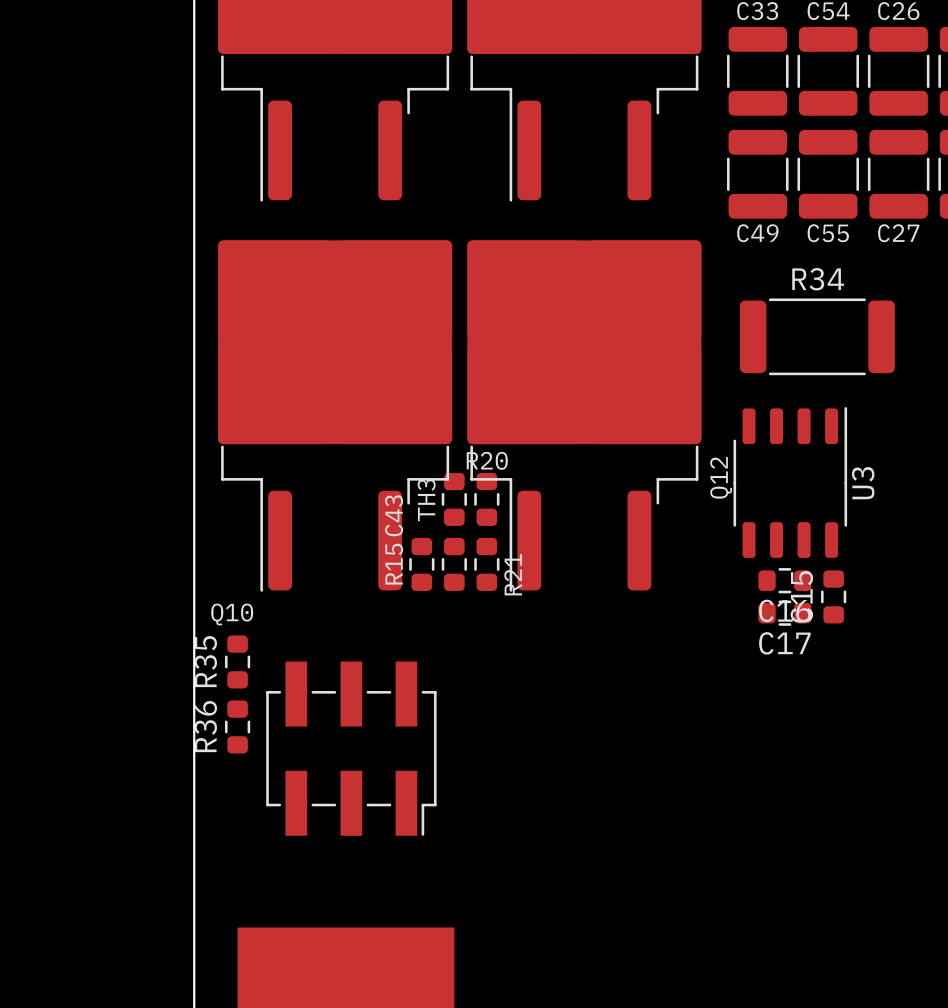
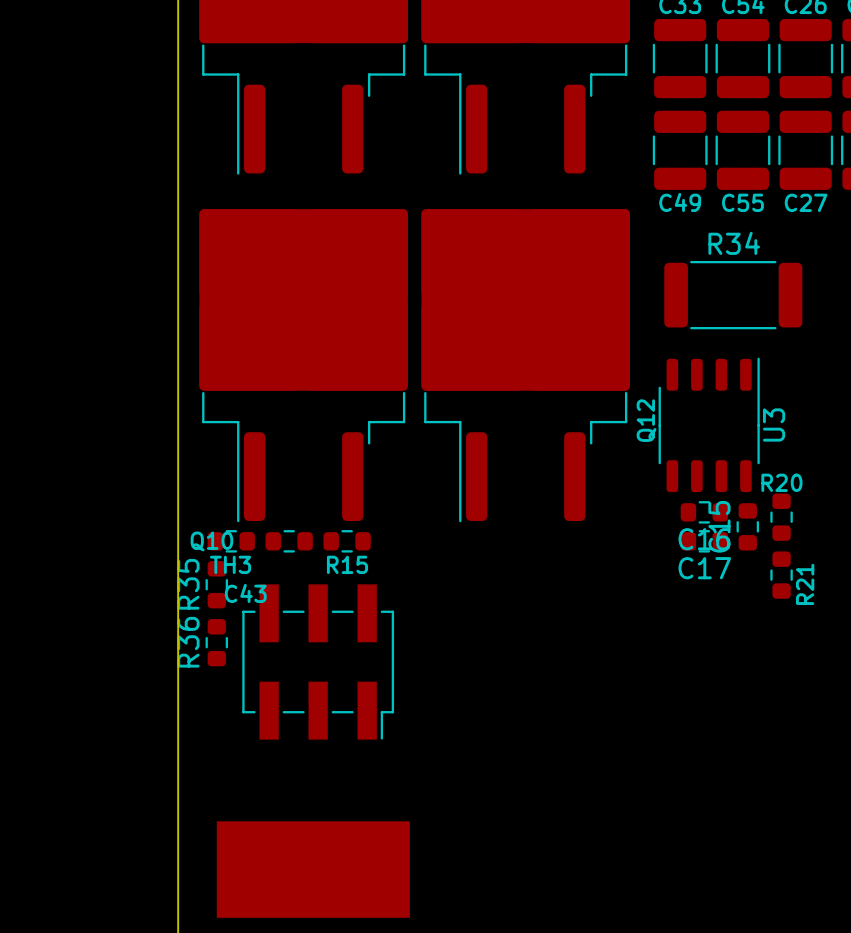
TH3 rotation: 0° (454, 499) -> 90° clockwise (231, 541)
TH3 position: (454, 499) -> (231, 541)
R20 position: (486, 499) -> (781, 517)
C43 name position: C43 (394, 515) -> C43 (245, 593)
R15 rotation: 0° (421, 564) -> 90° clockwise (347, 541)
R15 position: (421, 564) -> (347, 541)
C43 rotation: 0° (454, 564) -> 90° clockwise (289, 541)
C43 position: (454, 564) -> (289, 541)
R21 position: (486, 564) -> (781, 575)

